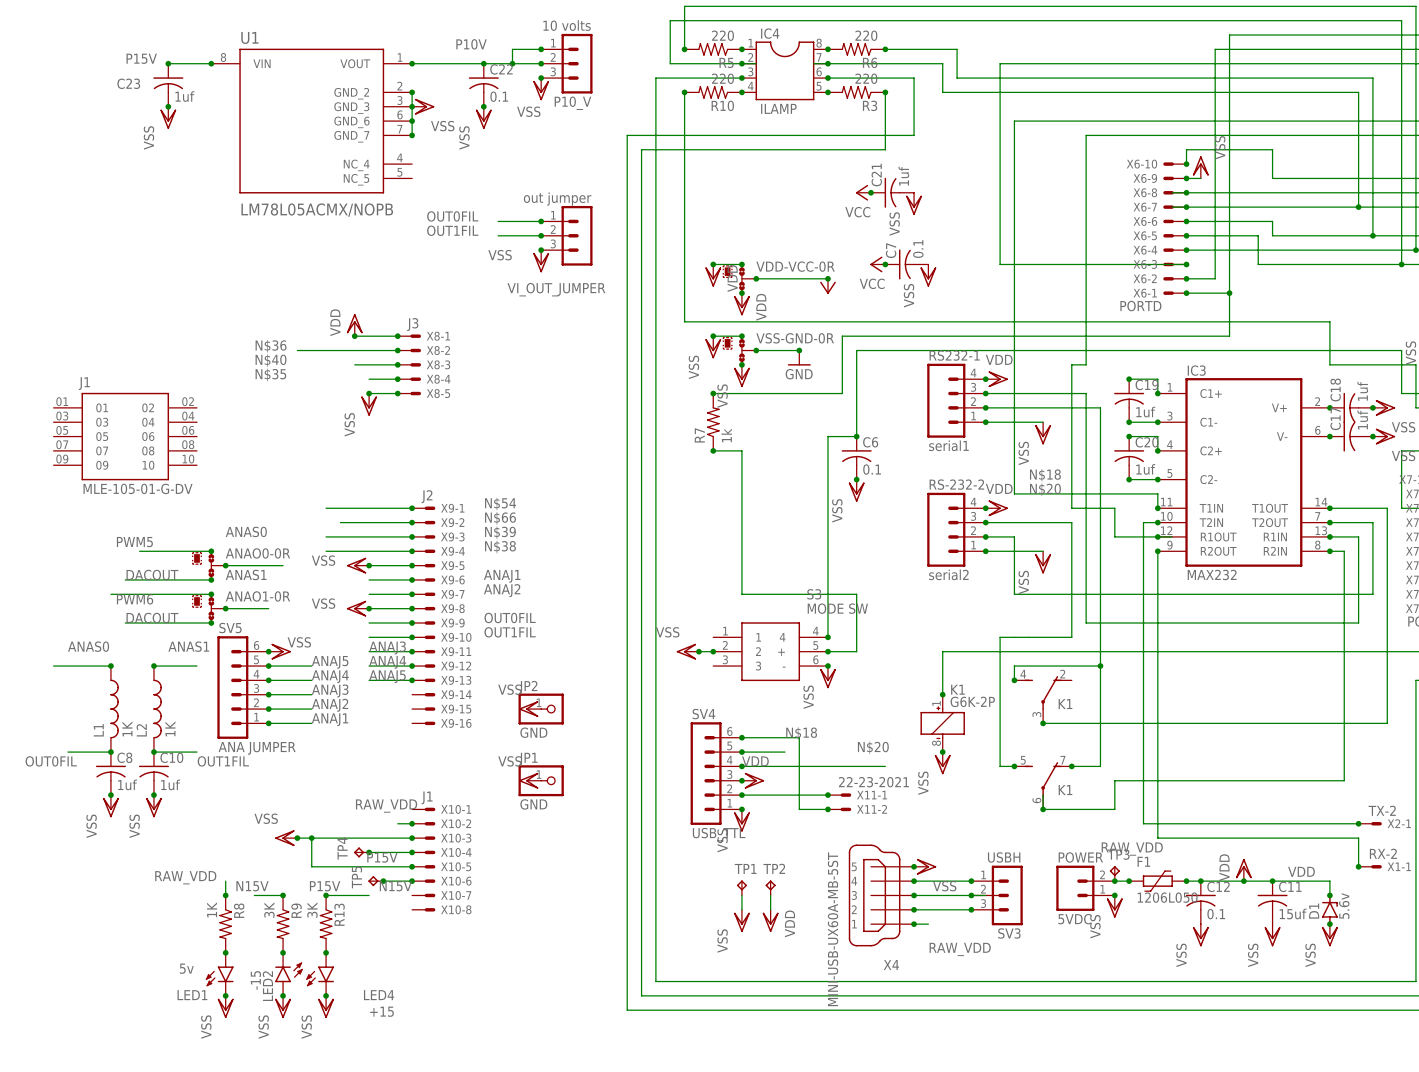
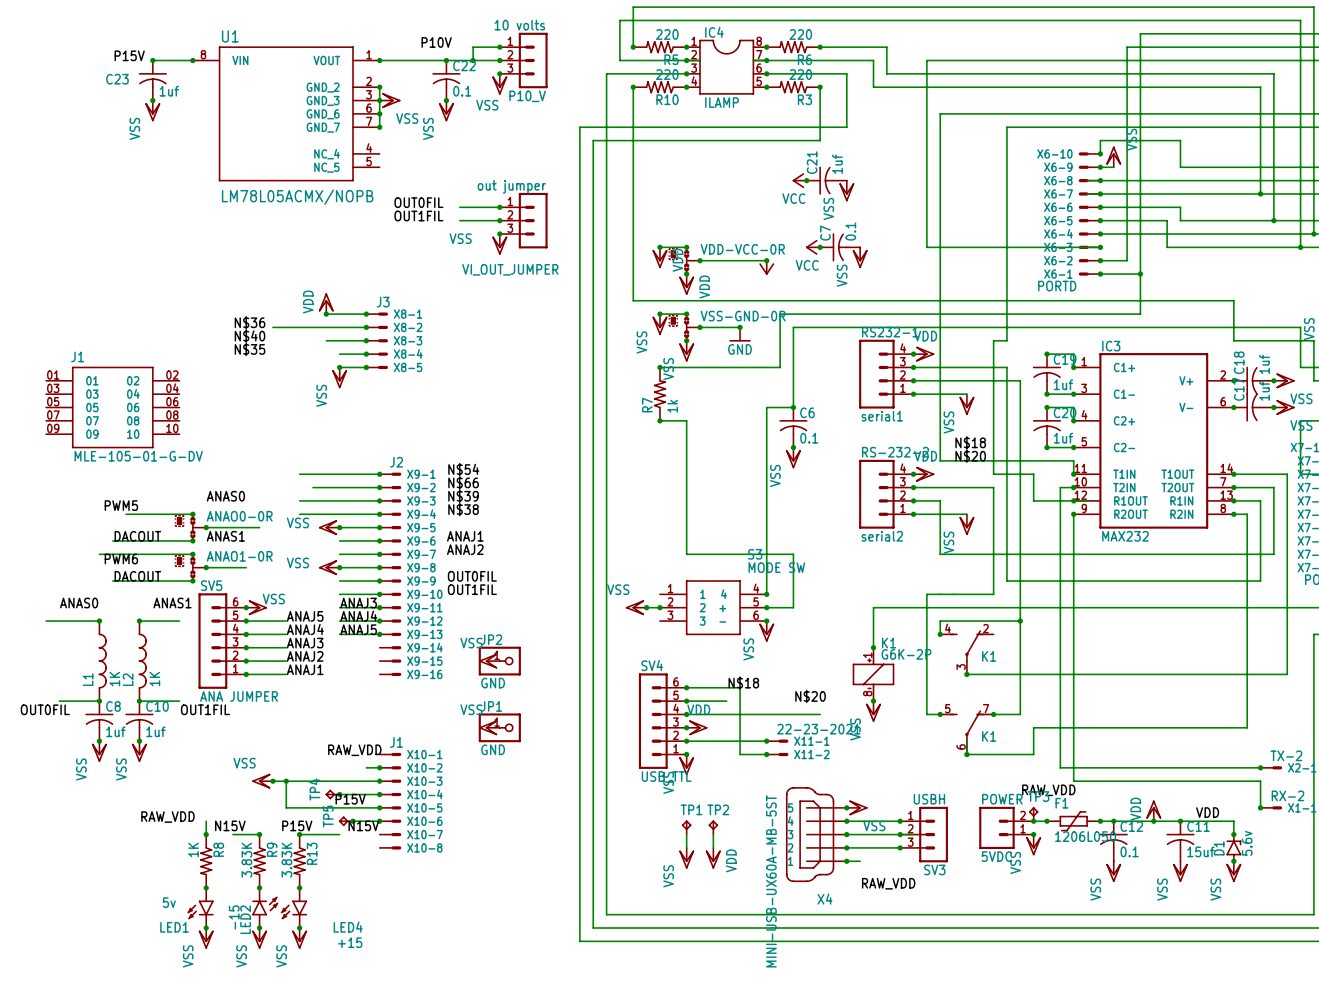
R9 value: 3K (269, 910) -> 3.83K (246, 860)
R13 value: 3K (312, 910) -> 3.83K (286, 860)

